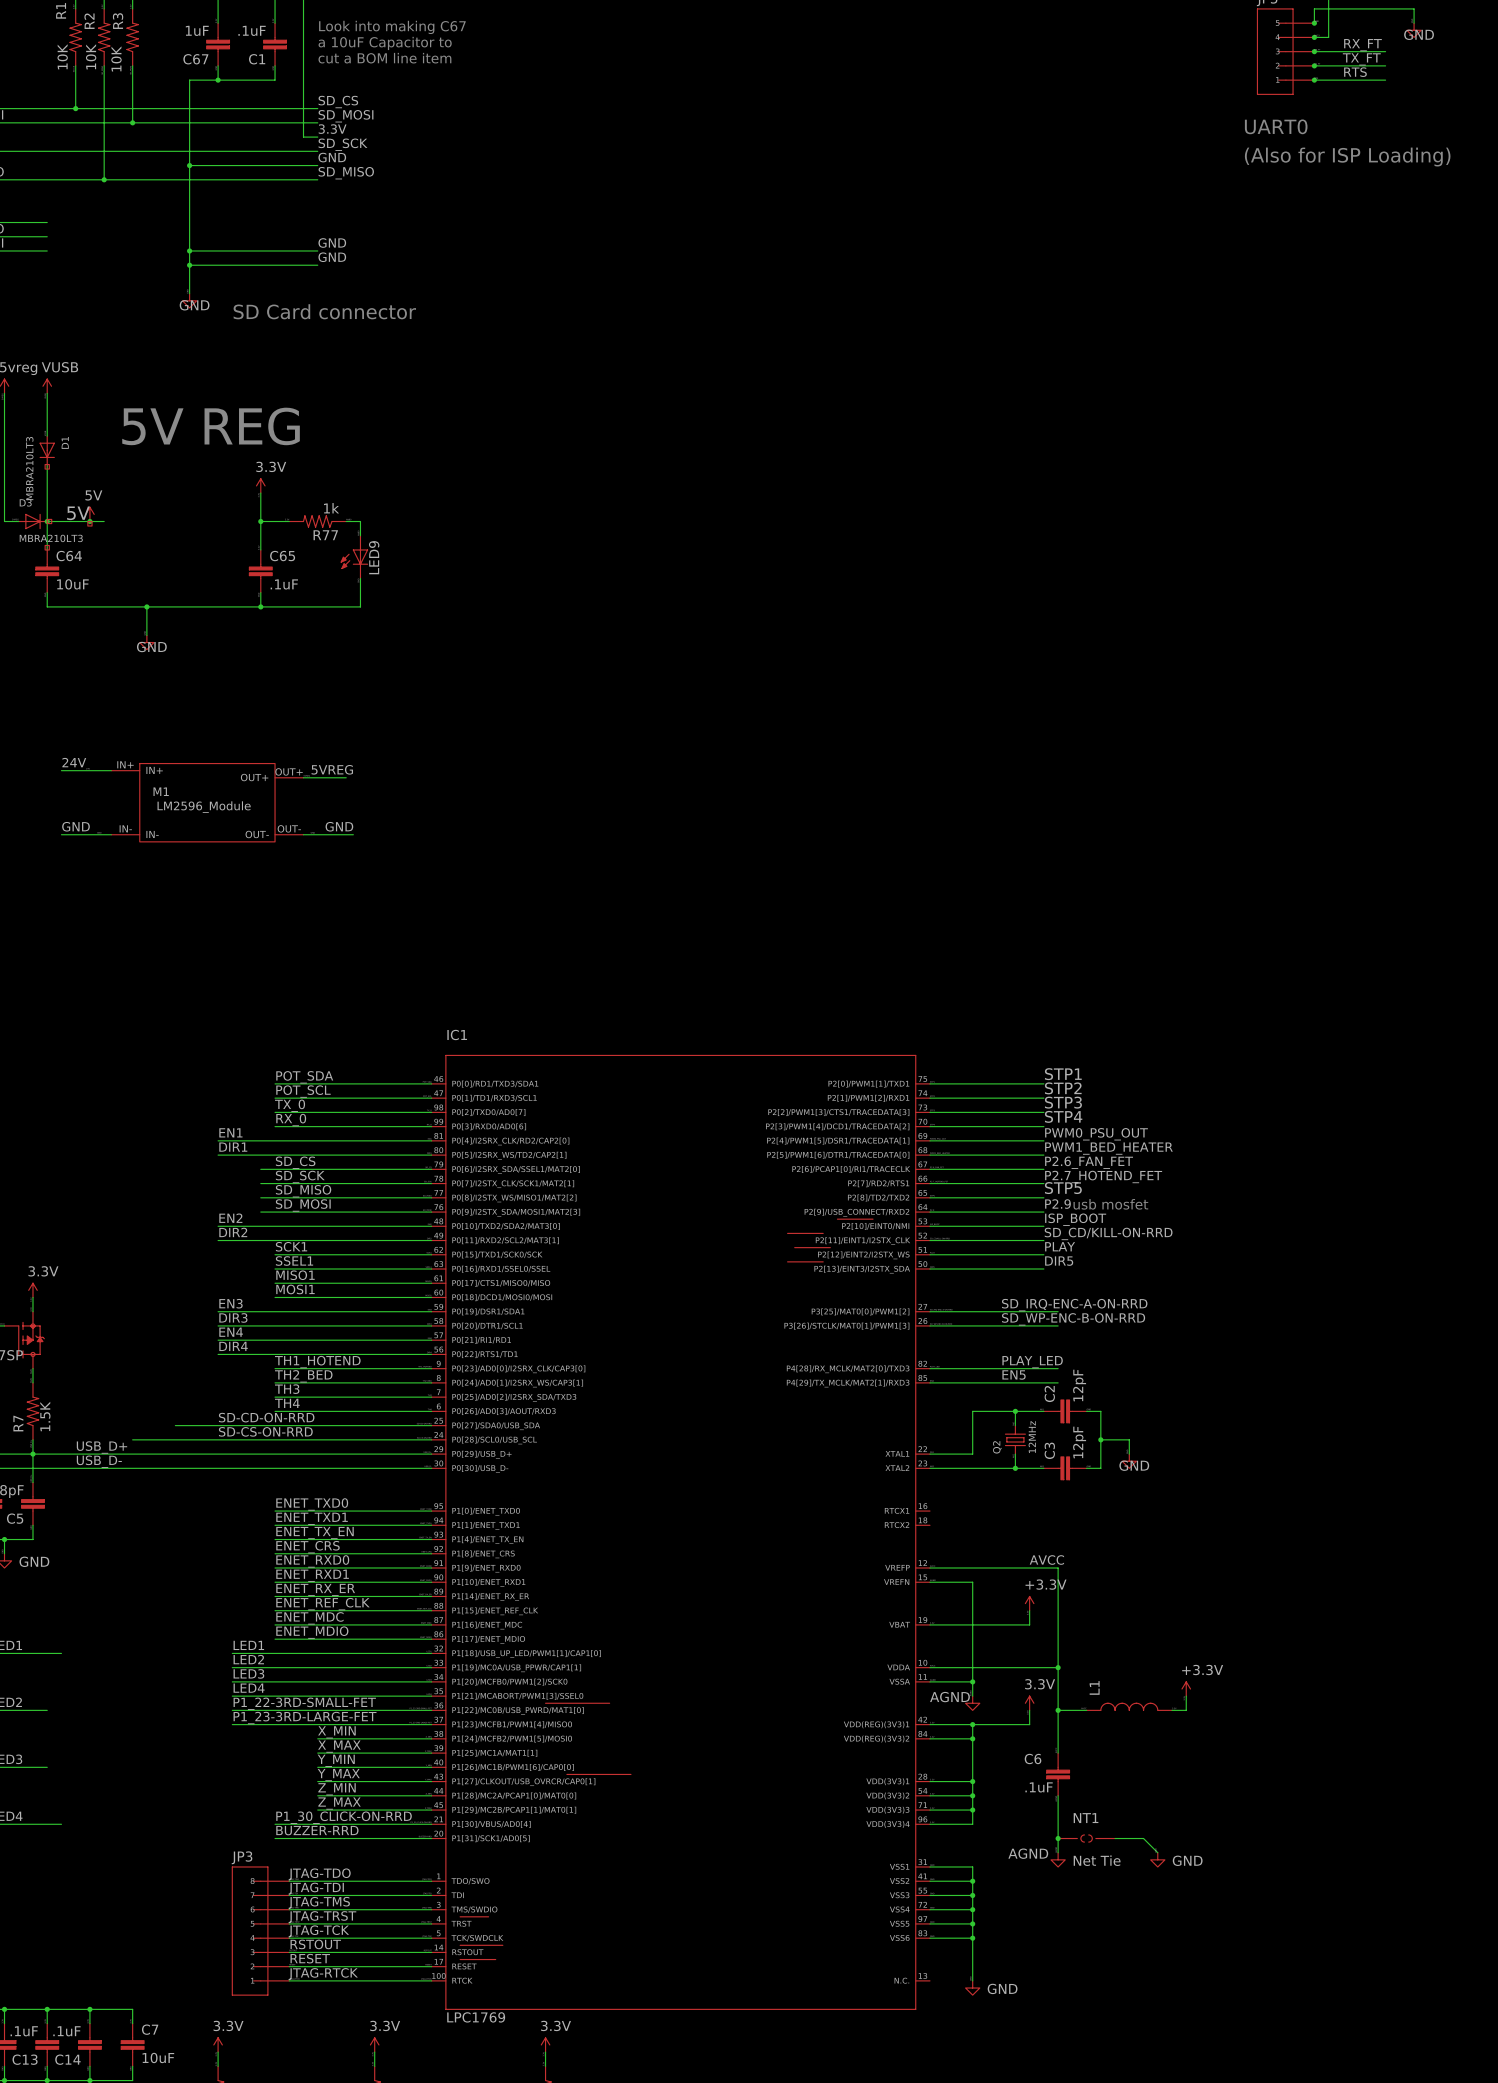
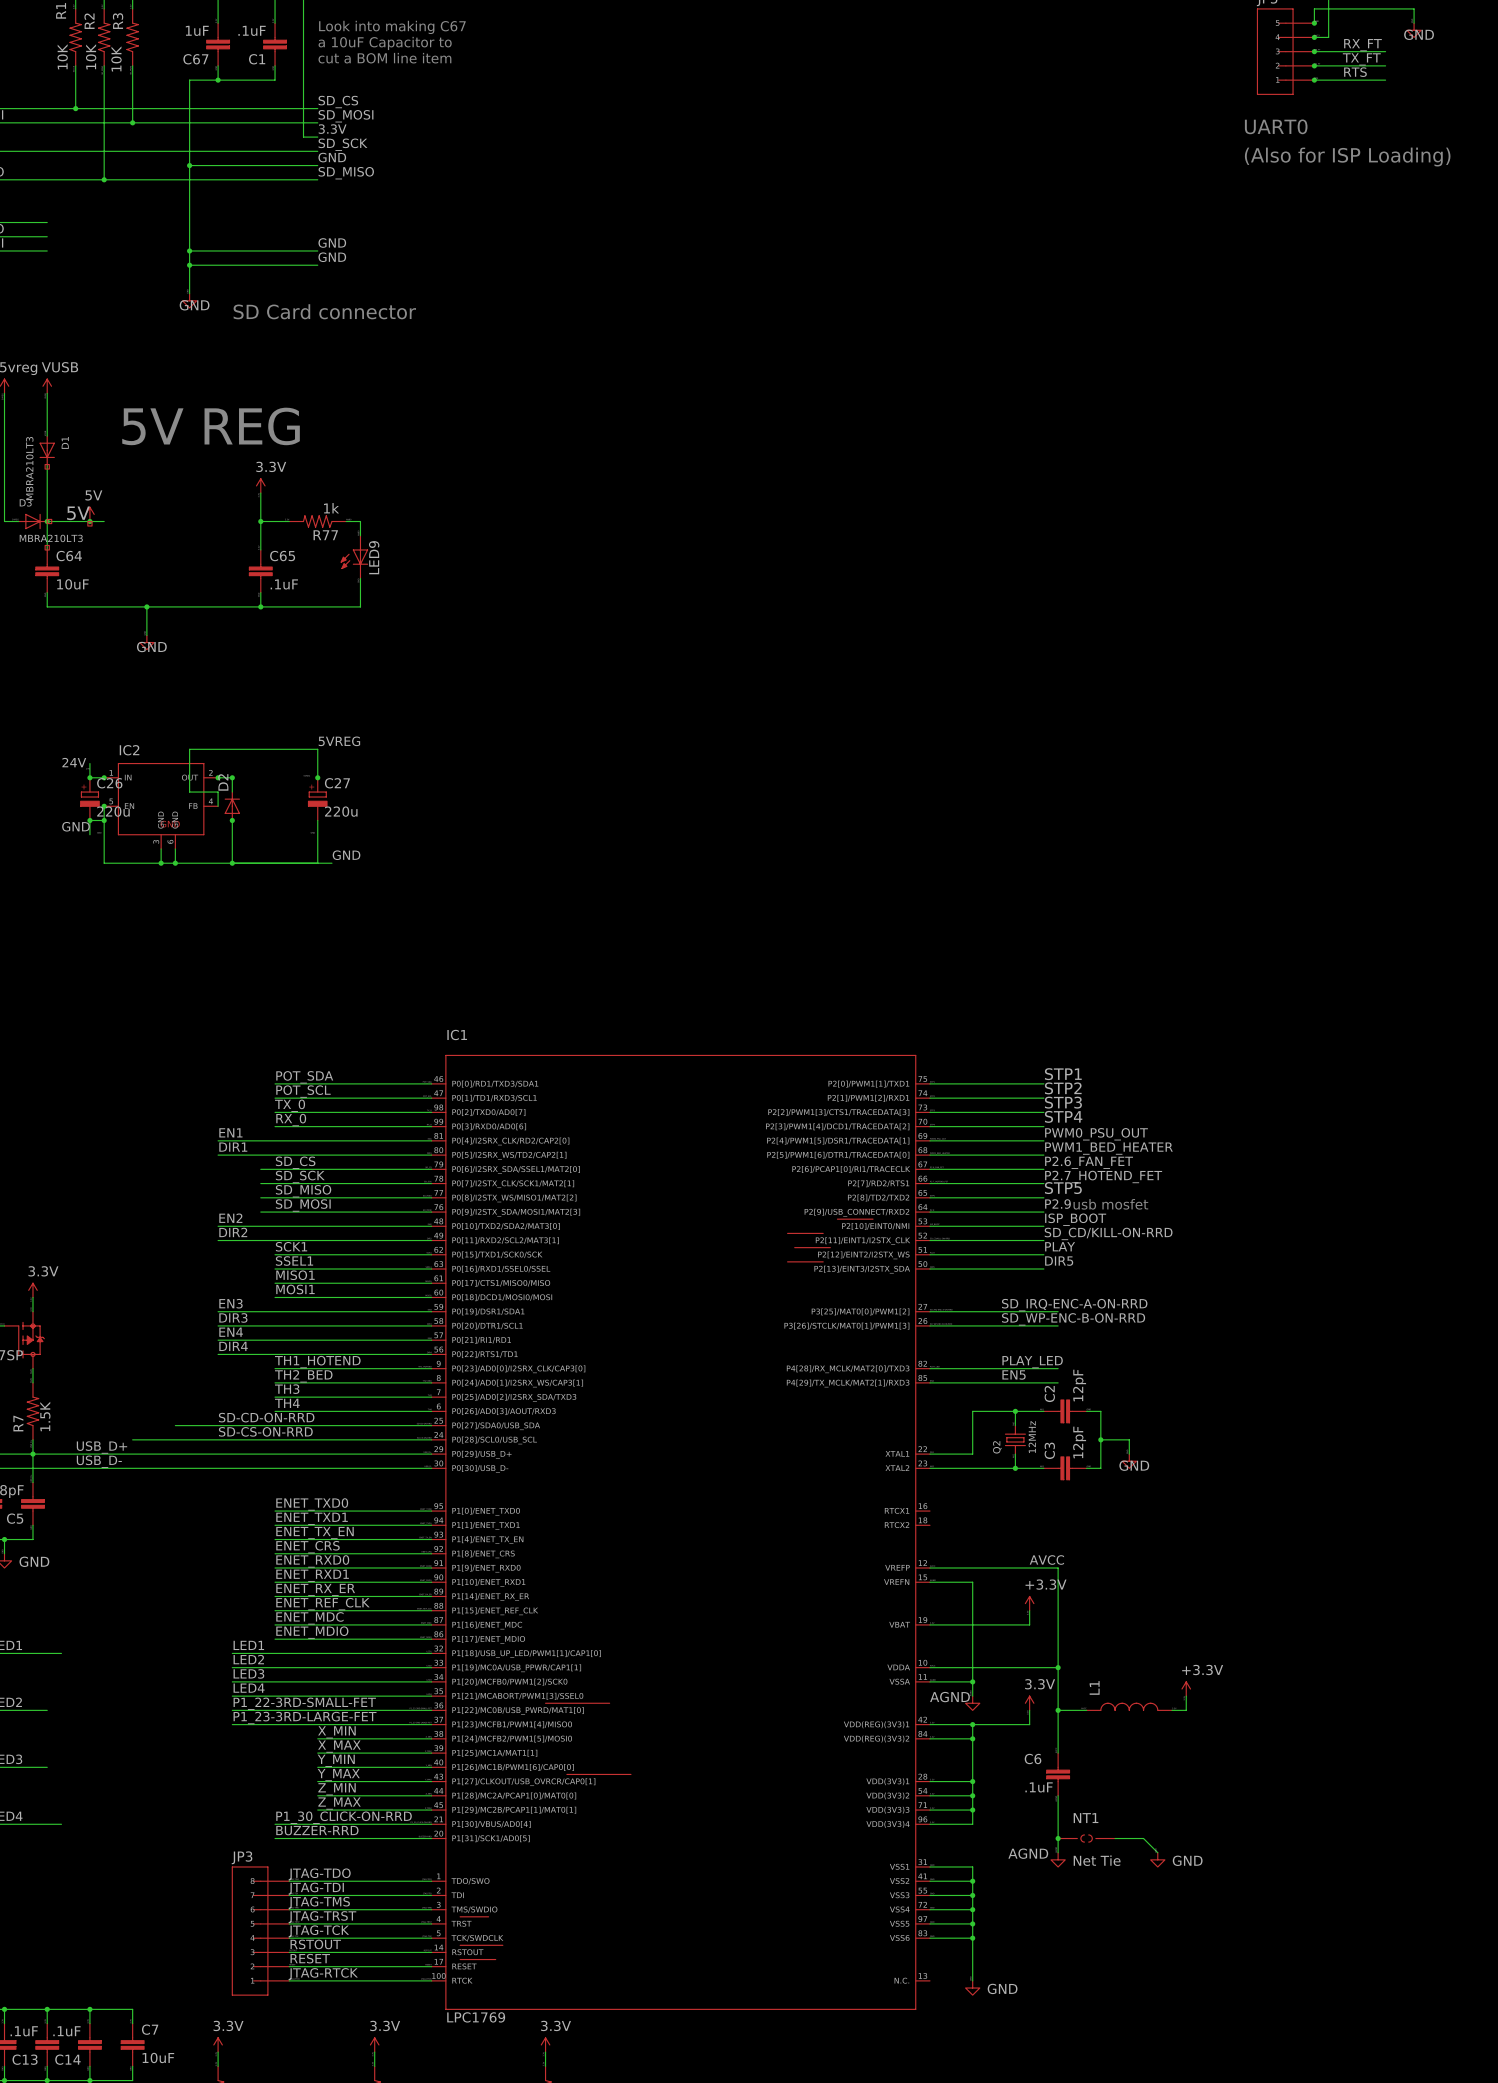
wire: none -> (89, 763) (89, 777) (104, 777)
label position: 5VREG (332, 769) -> 5VREG (339, 741)
wire: (61, 770) (111, 770) -> none
junction: none -> (89, 777)
junction: none -> (104, 777)
wire: none -> (218, 777) (232, 777) (232, 792)
junction: none -> (218, 777)
junction: none -> (232, 777)
wire: (303, 777) (346, 777) -> none
wire: none -> (317, 777) (317, 749) (189, 749) (189, 792) (218, 792) (218, 806)
junction: none -> (317, 777)
C26: none -> 220u (89, 799)
C27: none -> 220u (317, 799)
M1: LM2596_Module (207, 802) -> none
wire: none -> (104, 806) (104, 863) (331, 863)
junction: none -> (104, 806)
IC2: none -> (161, 806)
D2: none -> (232, 806)
junction: none -> (89, 820)
wire: none -> (104, 820) (89, 820) (89, 834)
junction: none -> (104, 820)
wire: none -> (232, 820) (232, 863)
junction: none -> (232, 820)
wire: none -> (317, 820) (317, 863)
label position: GND (339, 826) -> GND (346, 855)
wire: (61, 834) (111, 834) -> none
wire: (303, 834) (353, 834) -> none
wire: none -> (161, 848) (161, 863)
wire: none -> (175, 848) (175, 863)
junction: none -> (161, 863)
junction: none -> (175, 863)
junction: none -> (232, 863)

